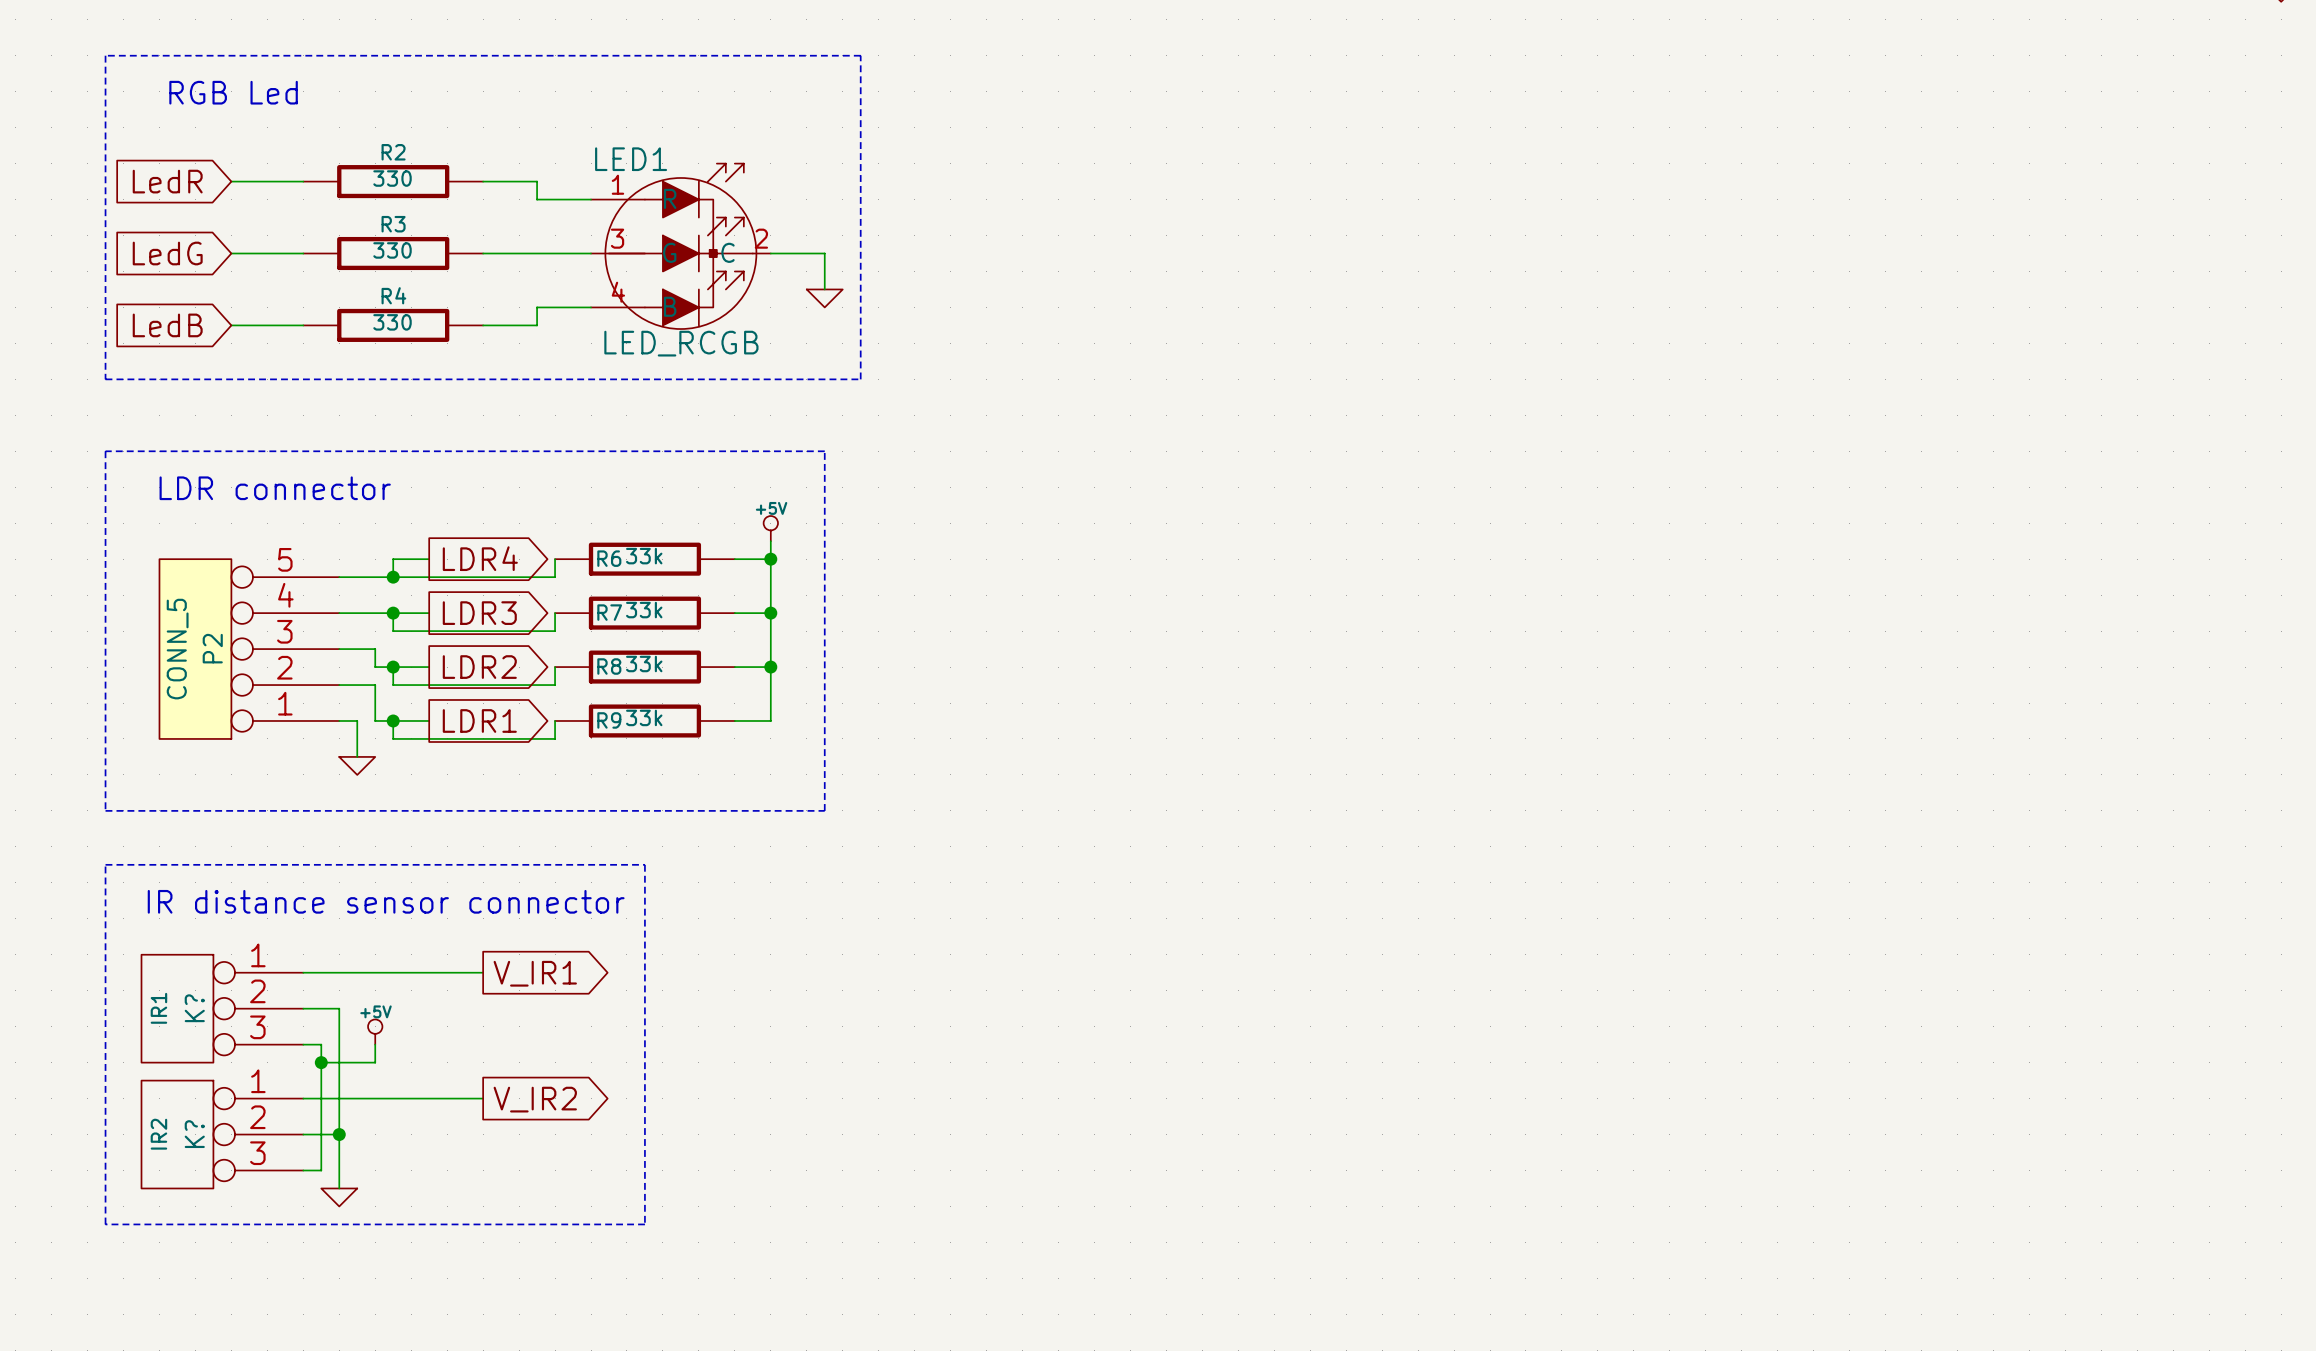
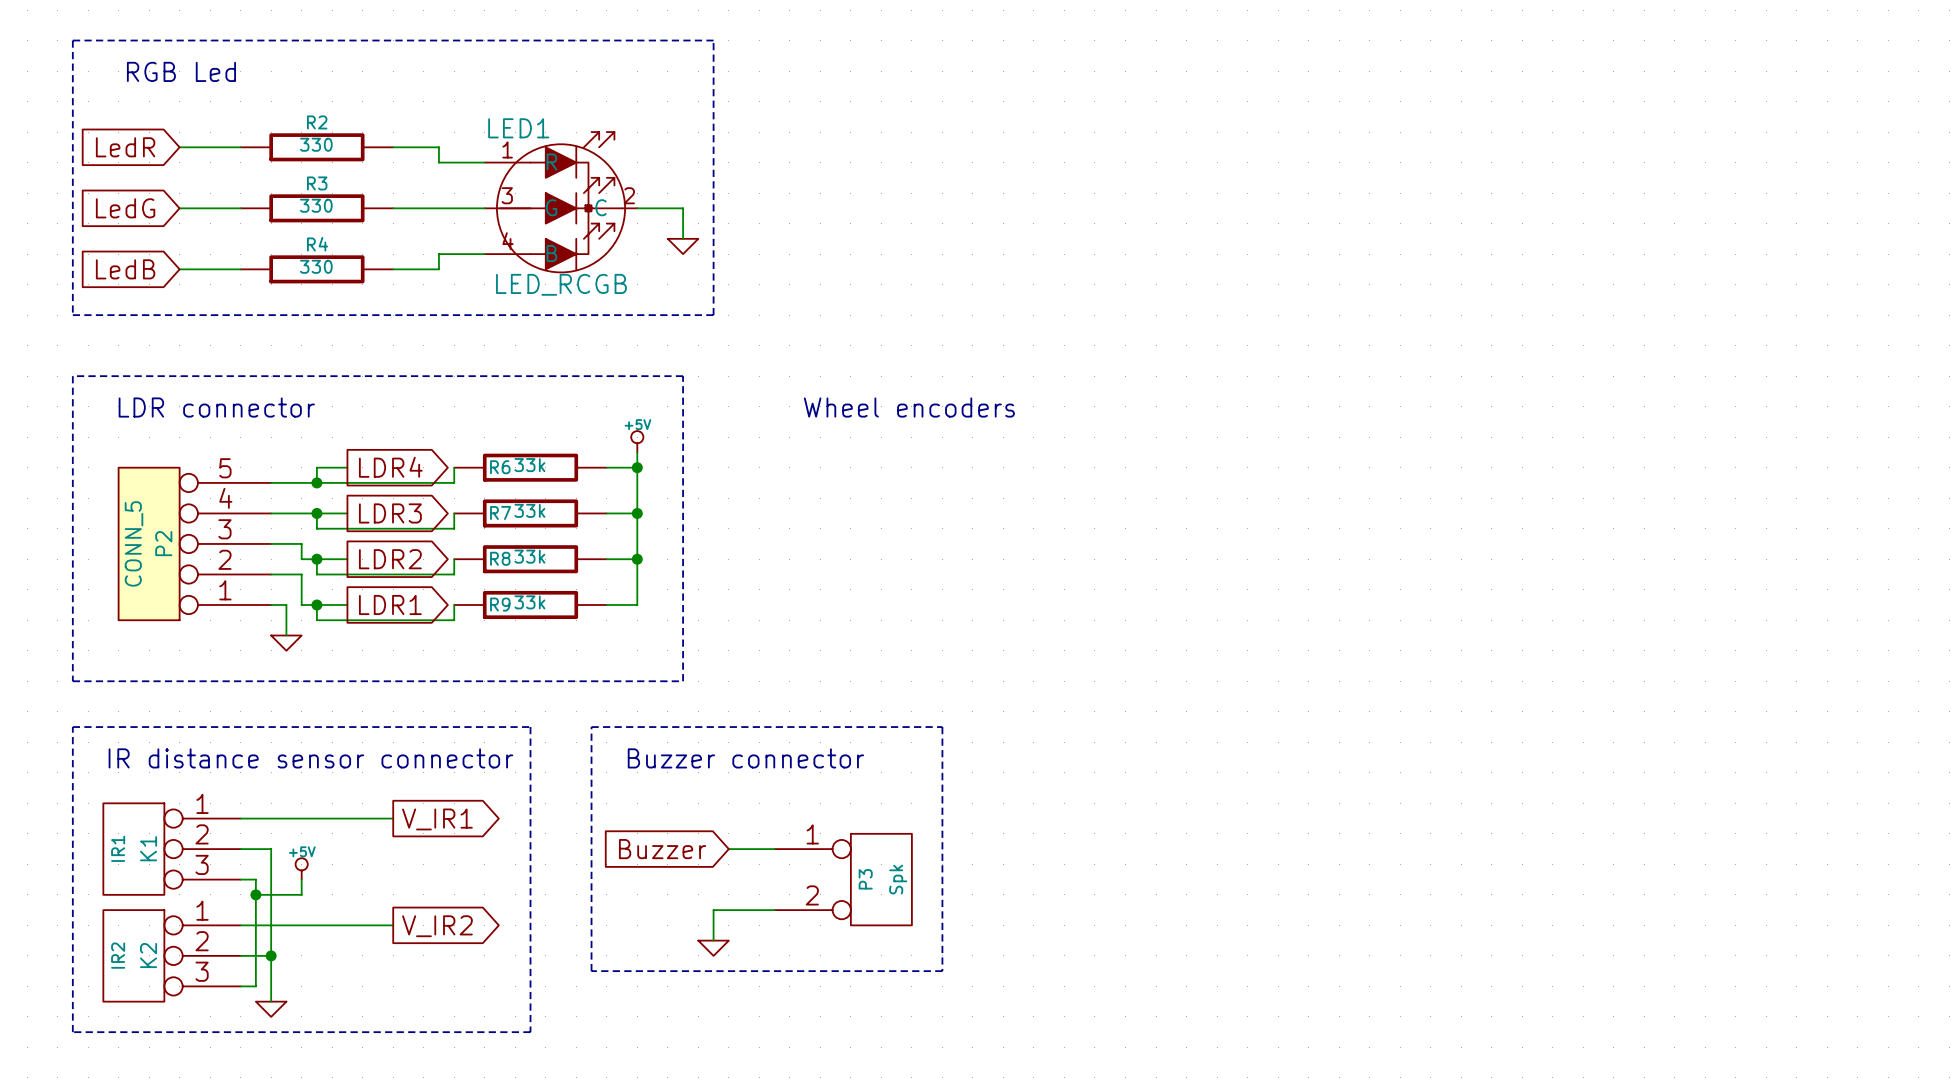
text: none -> Wheel encoders (909, 407)
line: none -> (591, 727) (942, 727) (942, 971) (591, 971) (591, 727)
text: none -> Buzzer connector (745, 758)
K? name: K? (194, 1008) -> K1 (148, 848)
global label: none -> Buzzer (662, 849)
wire: none -> (728, 849) (774, 849)
P3: none -> Spk (843, 879)
wire: none -> (774, 910) (713, 910) (713, 940)
power symbol: none -> (713, 948)
K? name: K? (194, 1134) -> K2 (148, 955)

